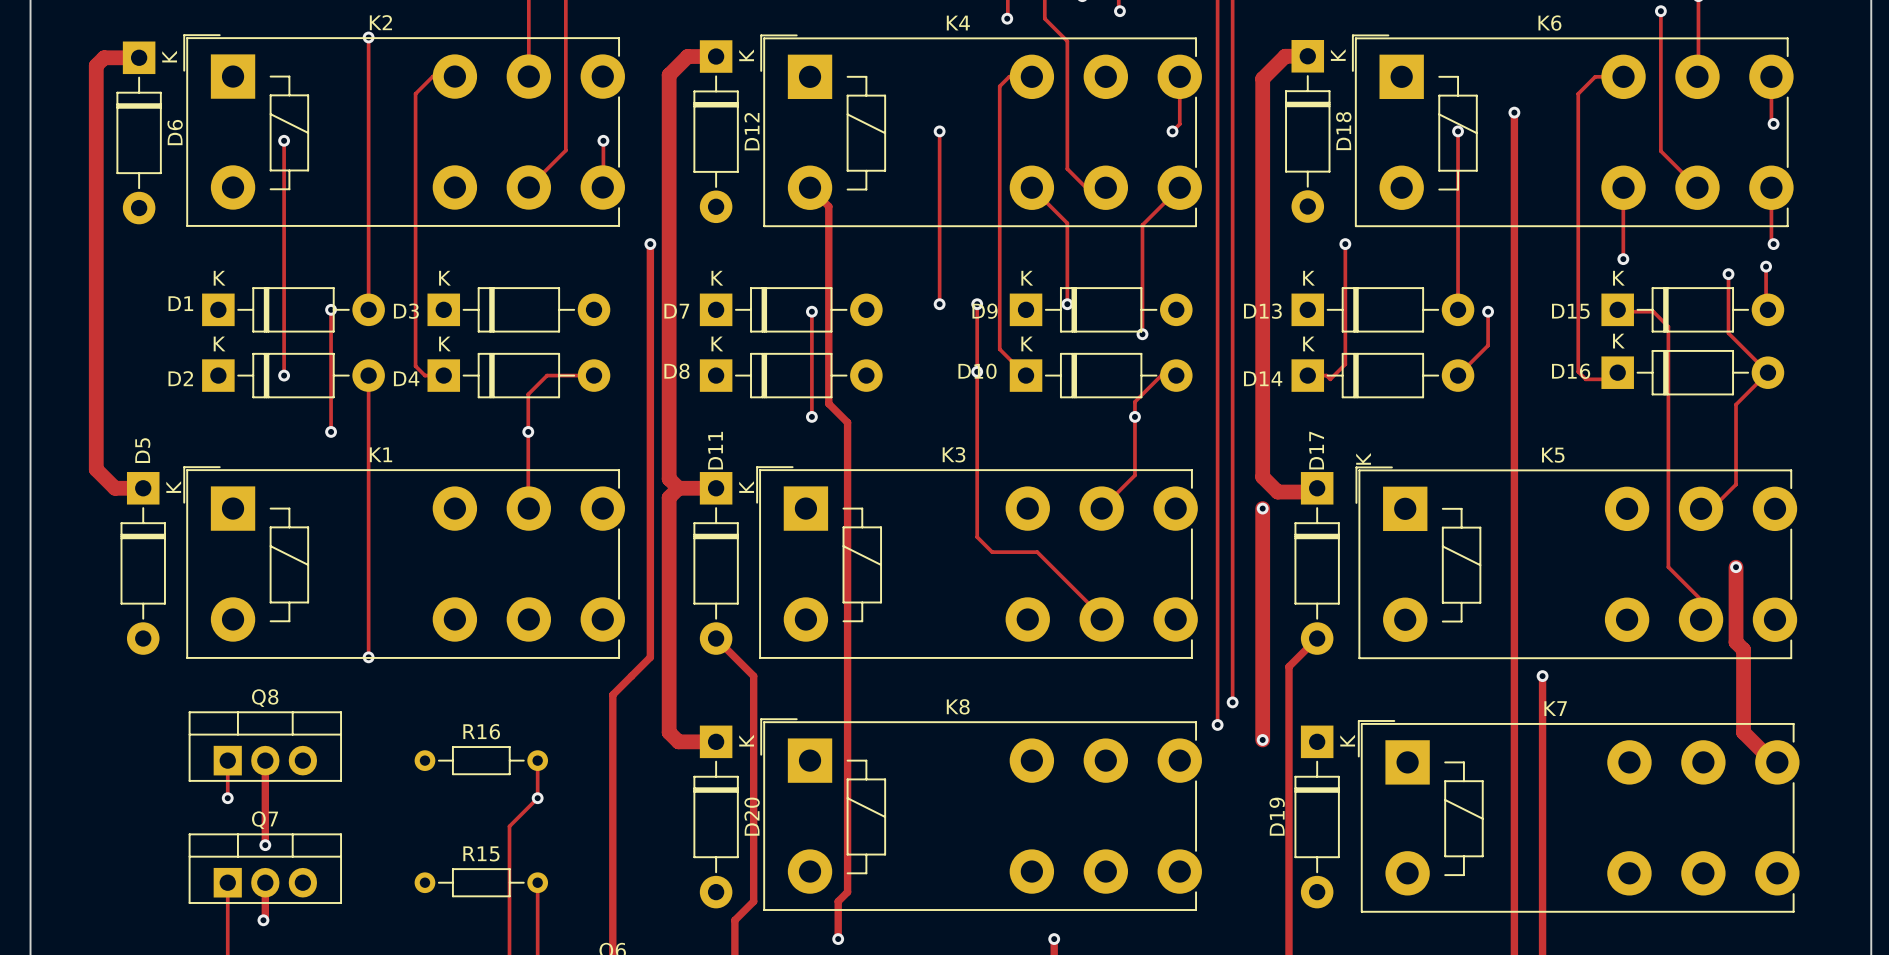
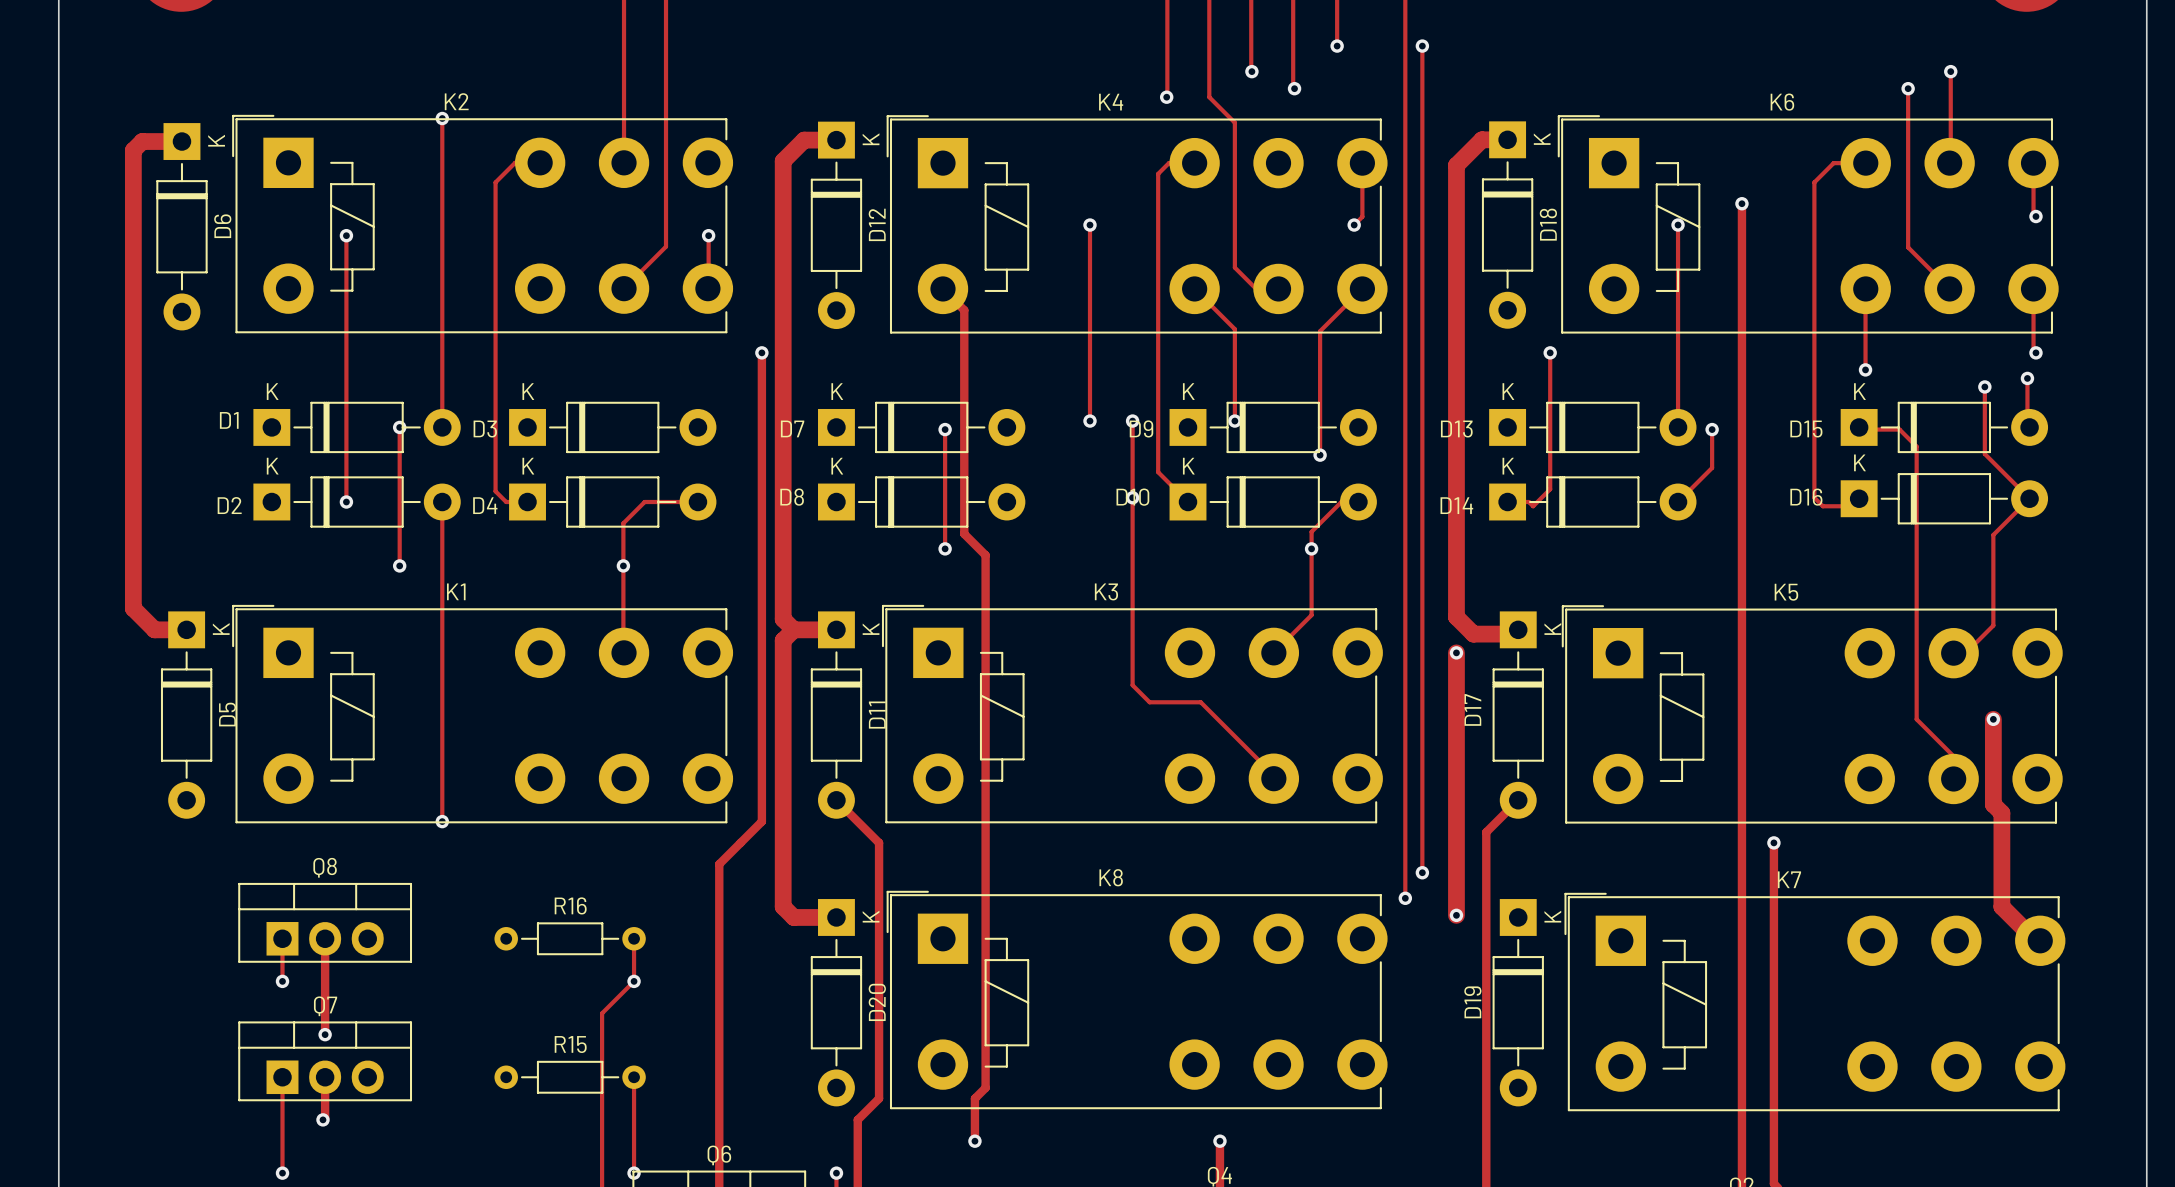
D5 name position: D5 (142, 450) -> D5 (227, 714)
D11 name position: D11 (715, 450) -> D11 (877, 715)
D17 name position: D17 (1316, 450) -> D17 (1472, 709)
D17 text position: K (1363, 458) -> K (1552, 629)

